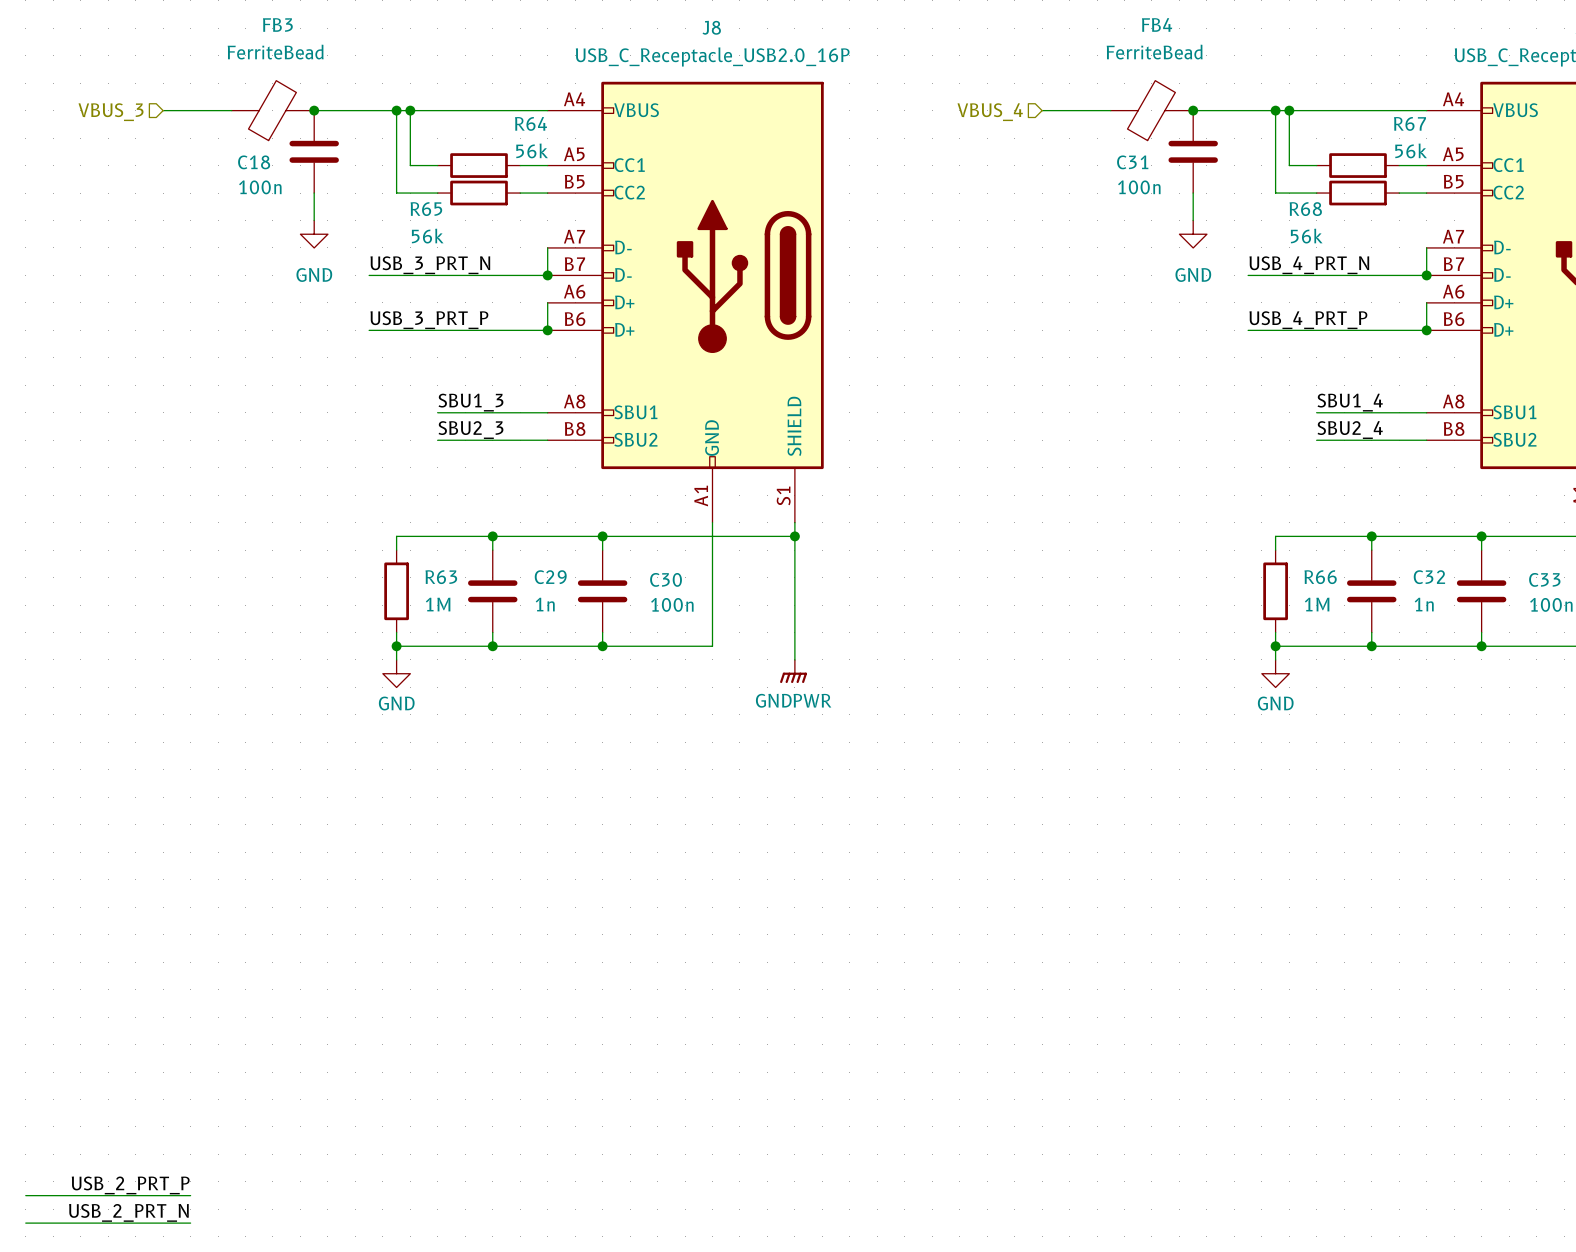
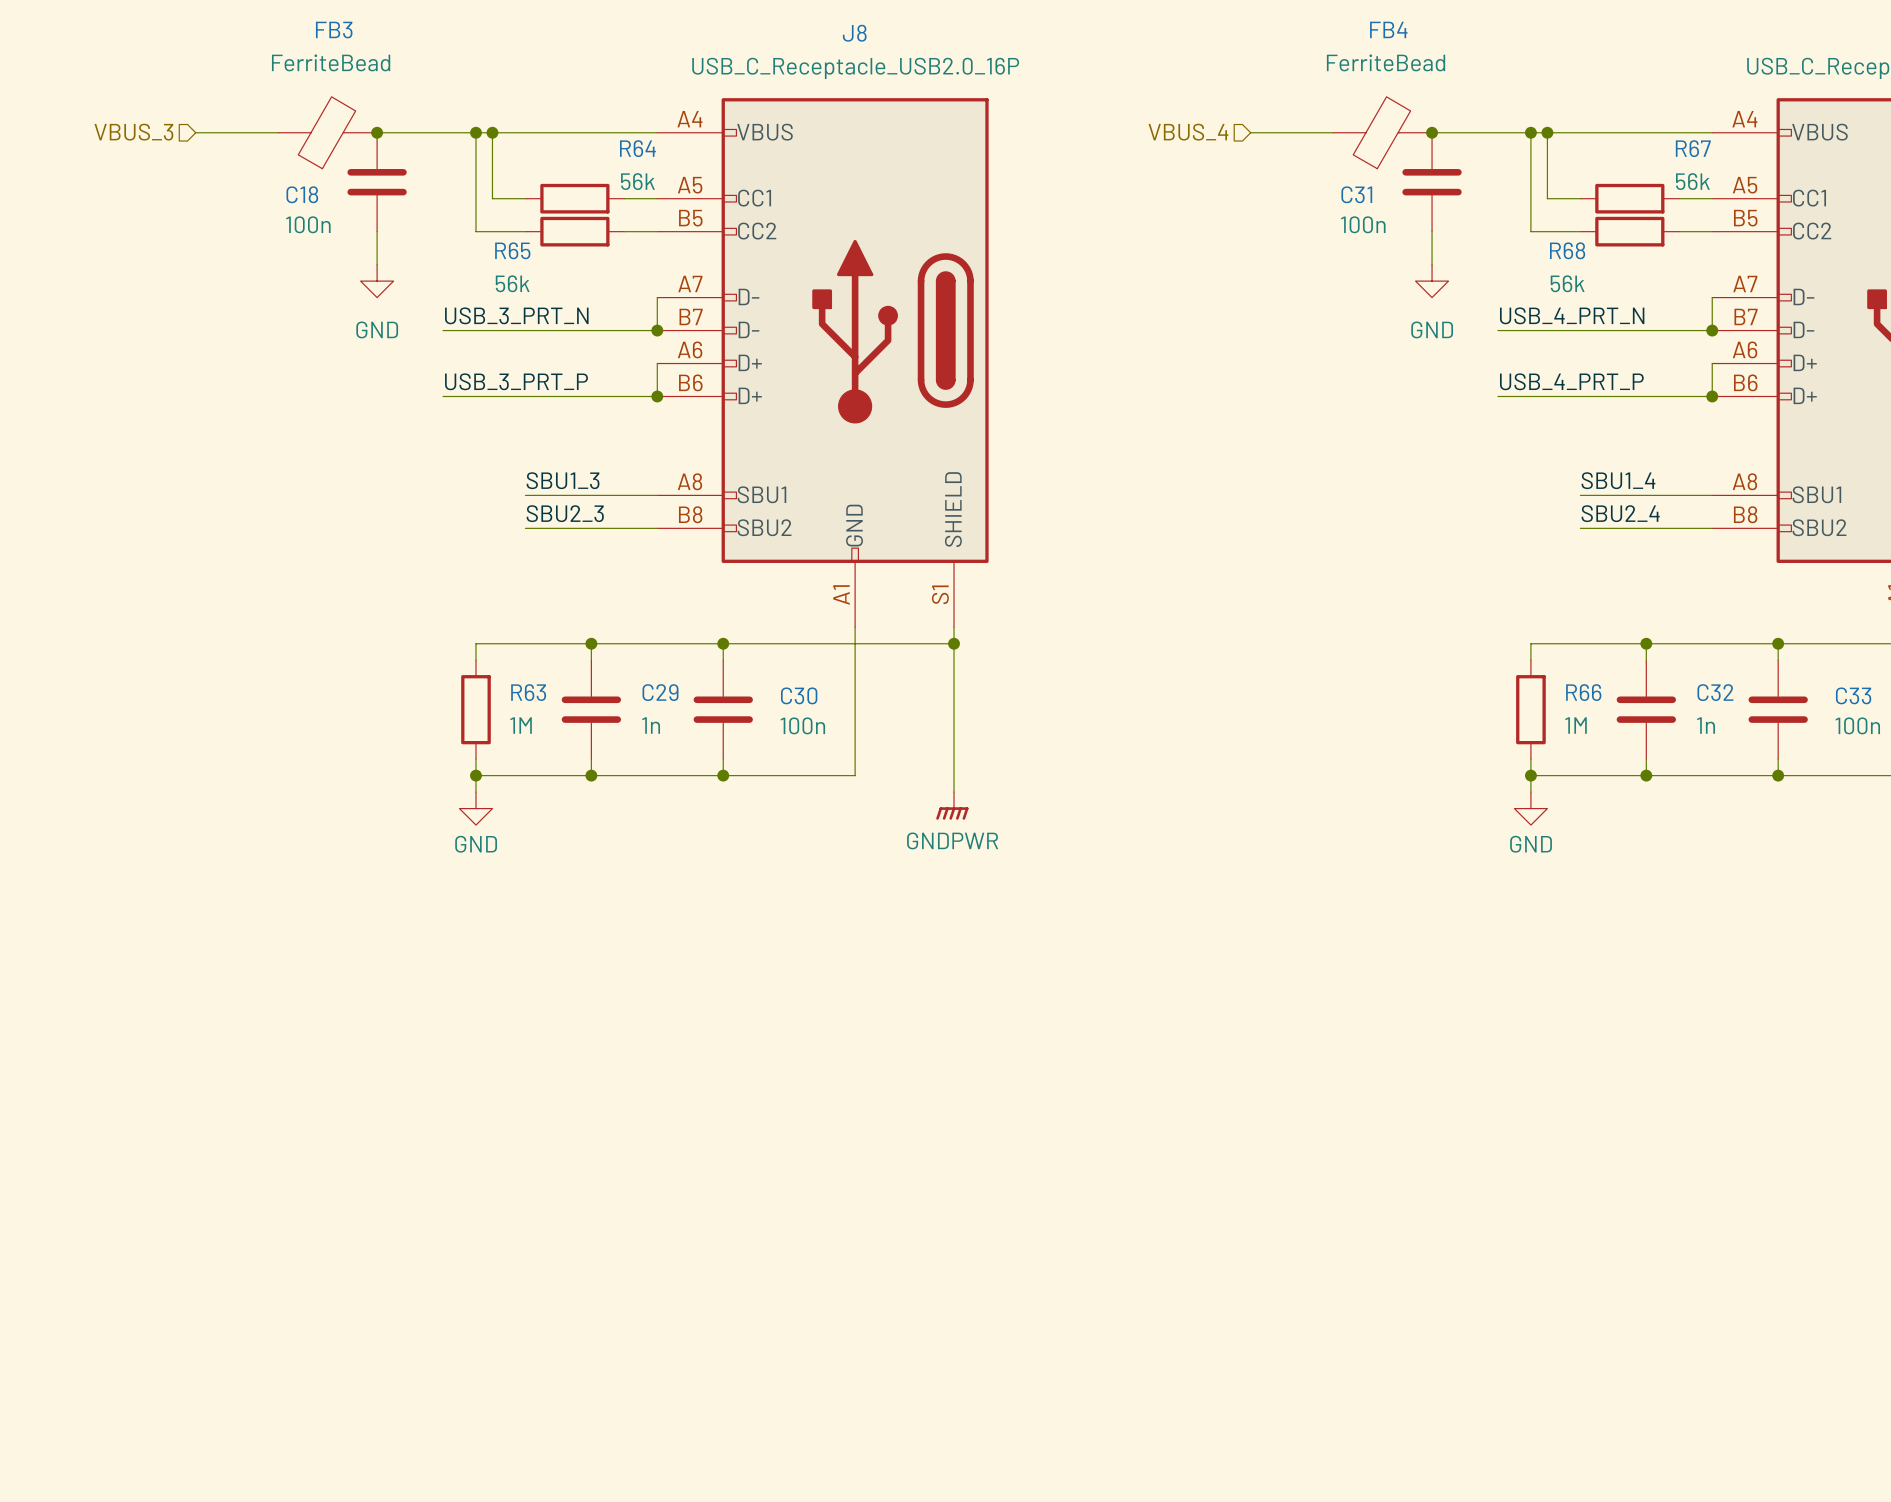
label: USB_2_PRT_P (130, 1185) -> none
wire: (25, 1195) (190, 1195) -> none
label: USB_2_PRT_N (128, 1212) -> none
wire: (25, 1223) (190, 1223) -> none

